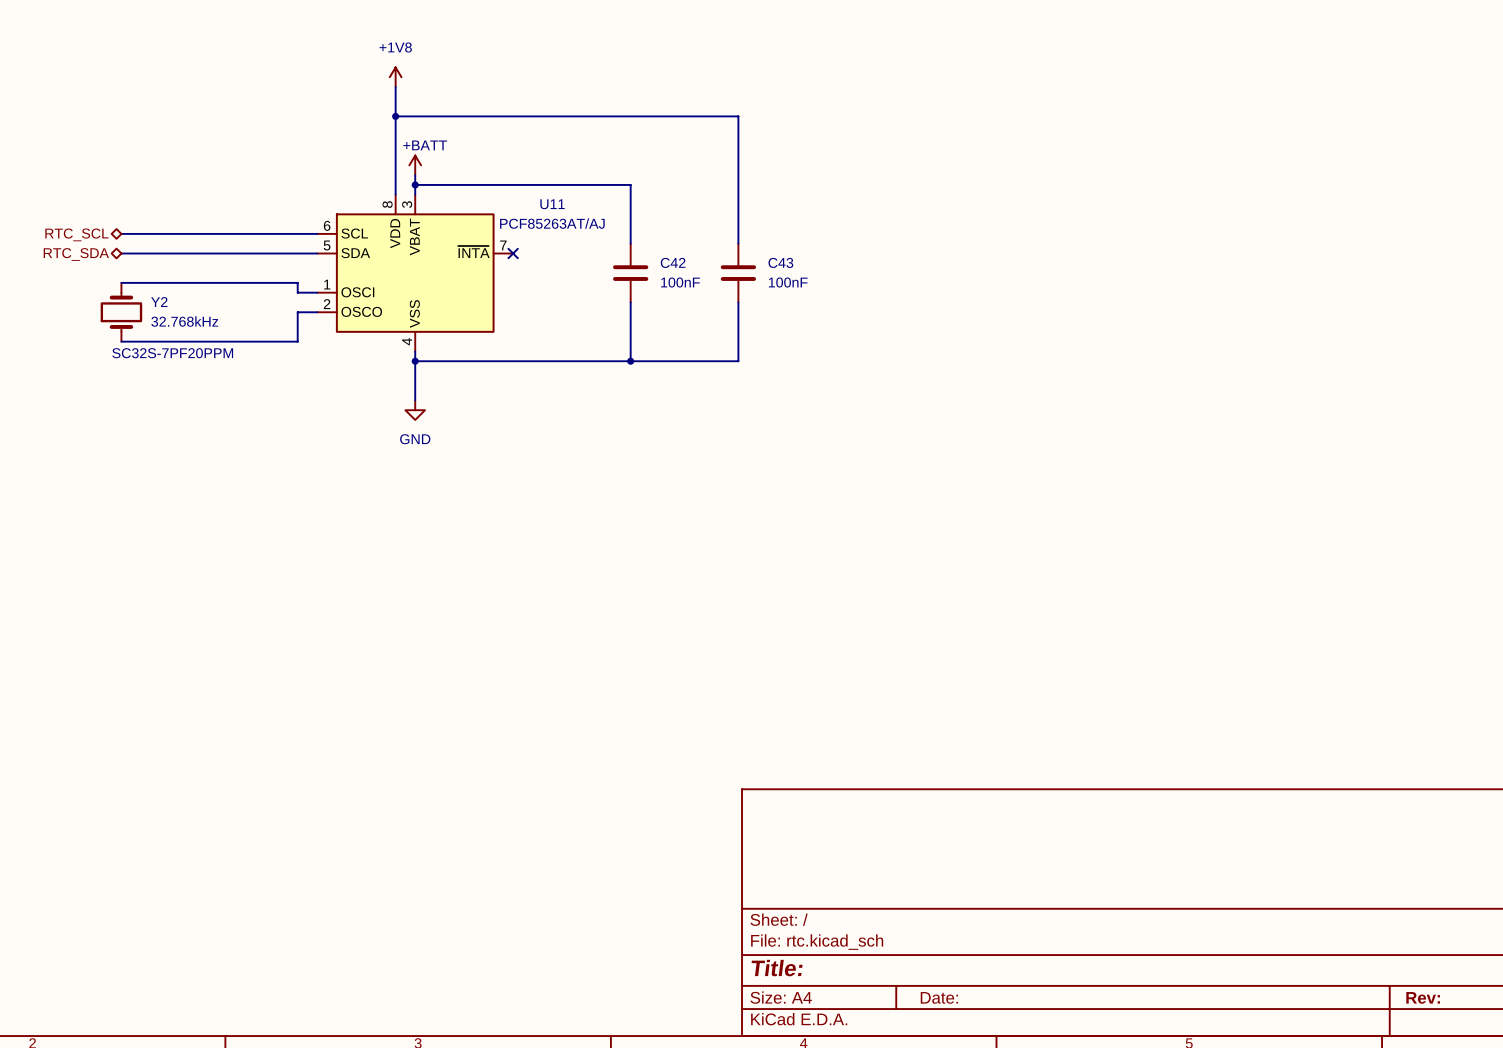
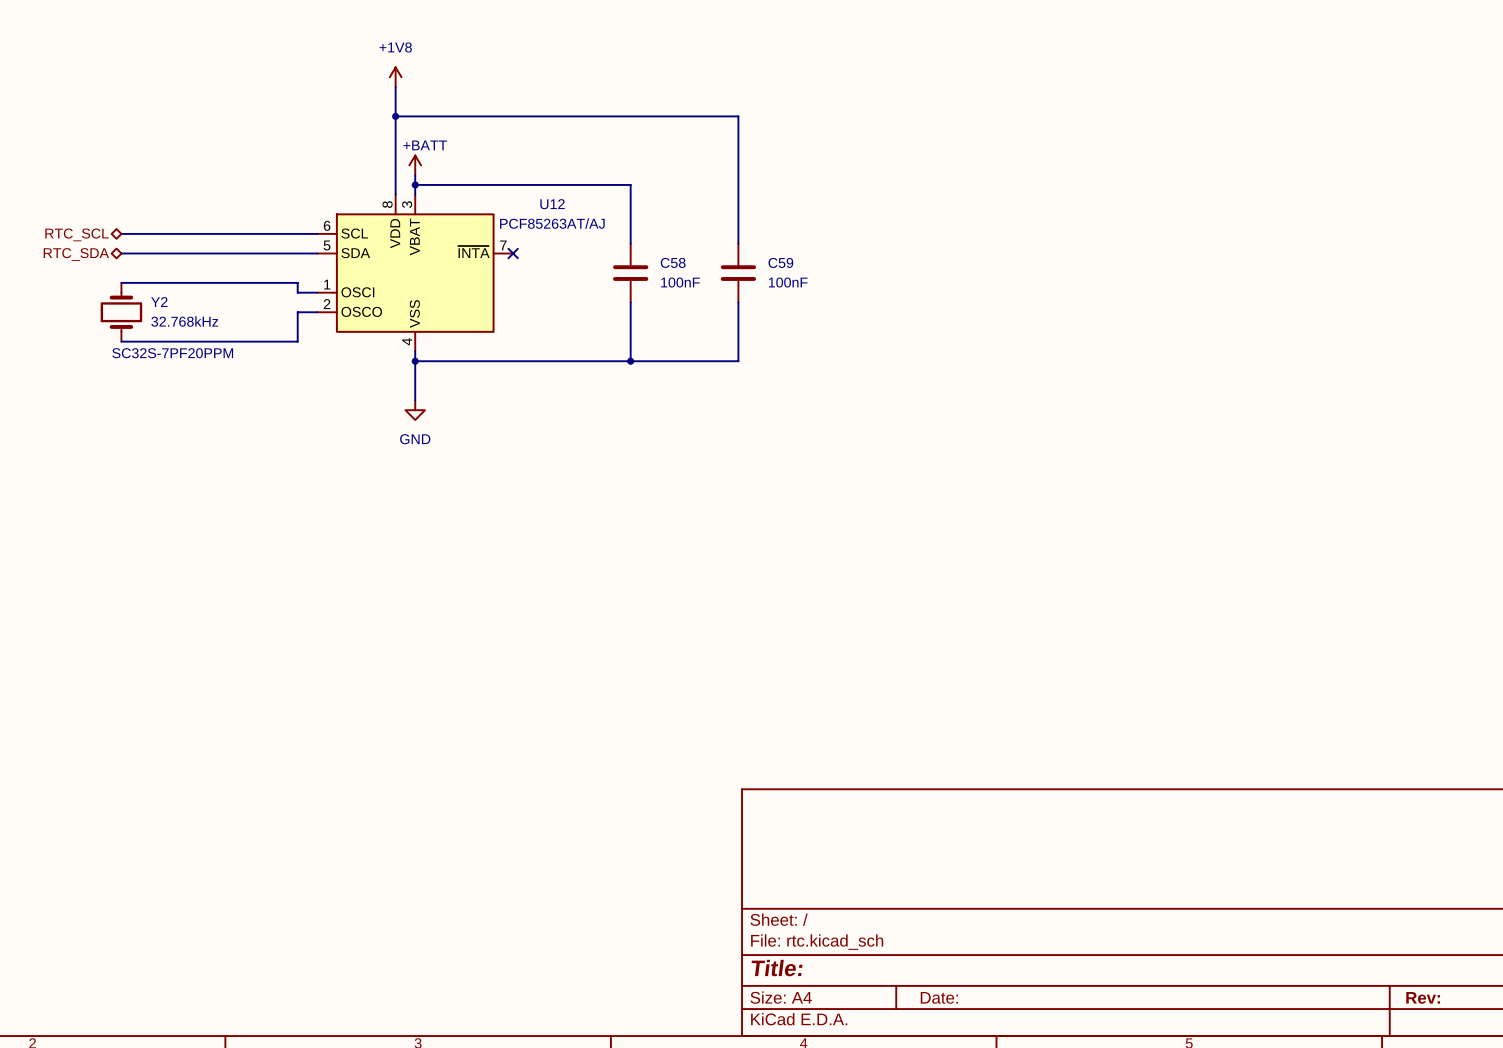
U11 name: U11 (552, 204) -> U12 (552, 204)
C42 name: C42 (673, 262) -> C58 (673, 262)
C43 name: C43 (780, 262) -> C59 (780, 262)

